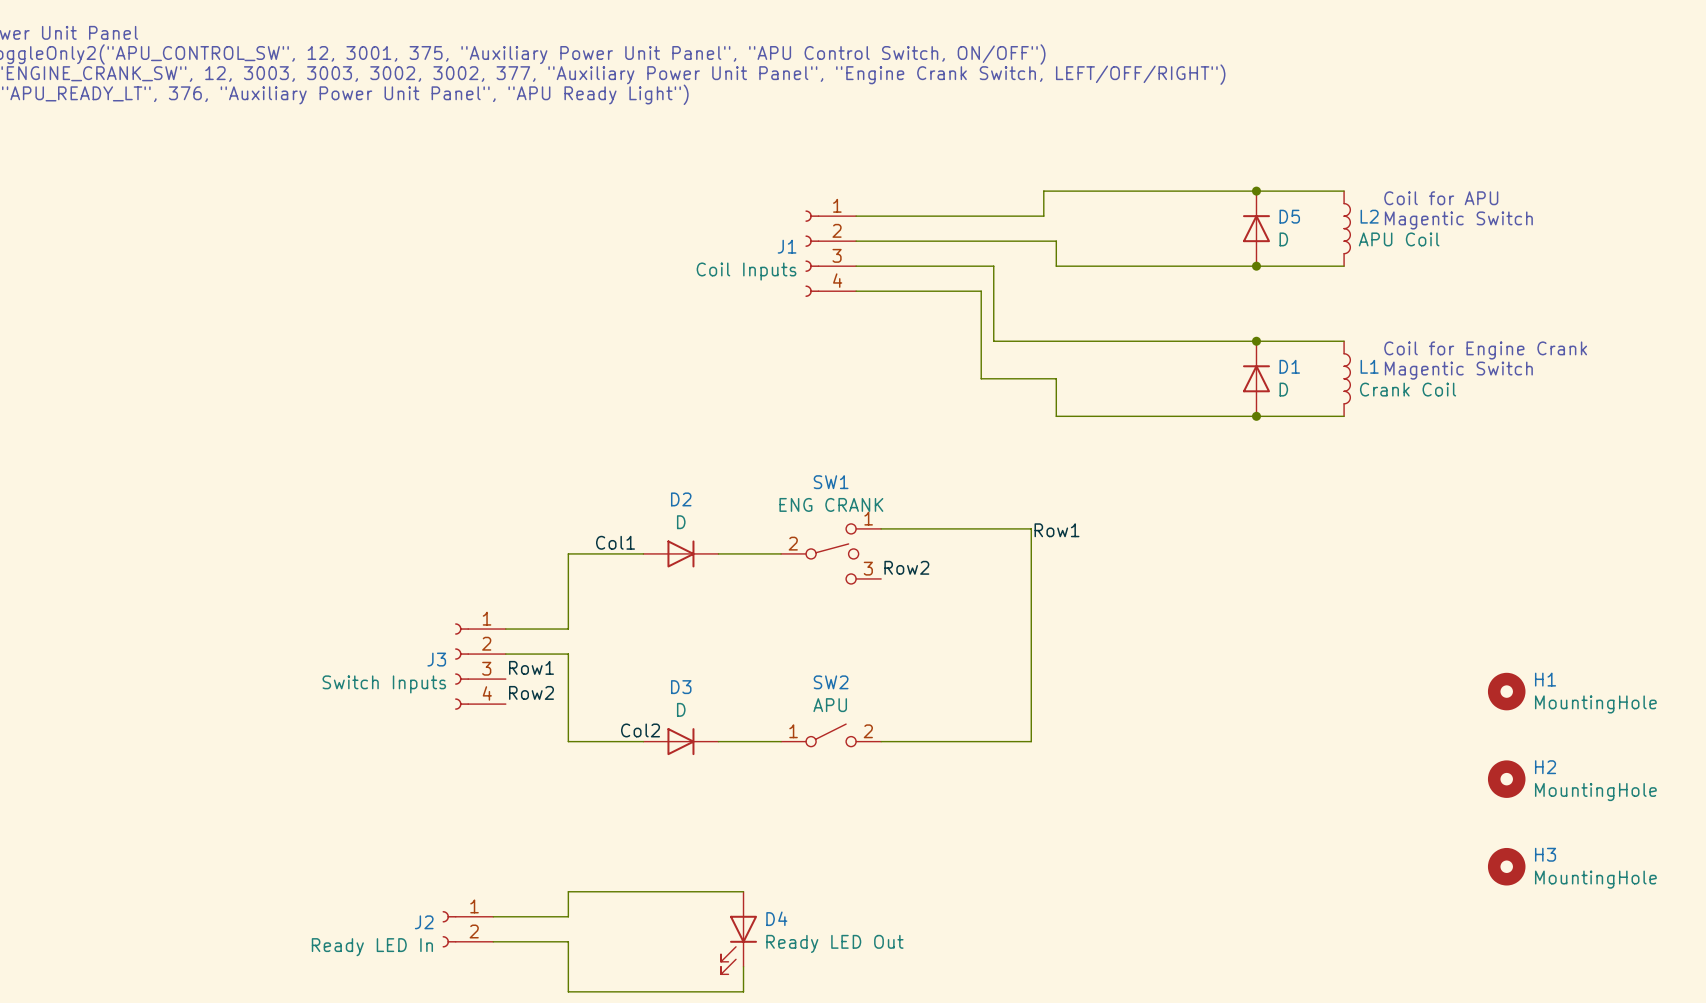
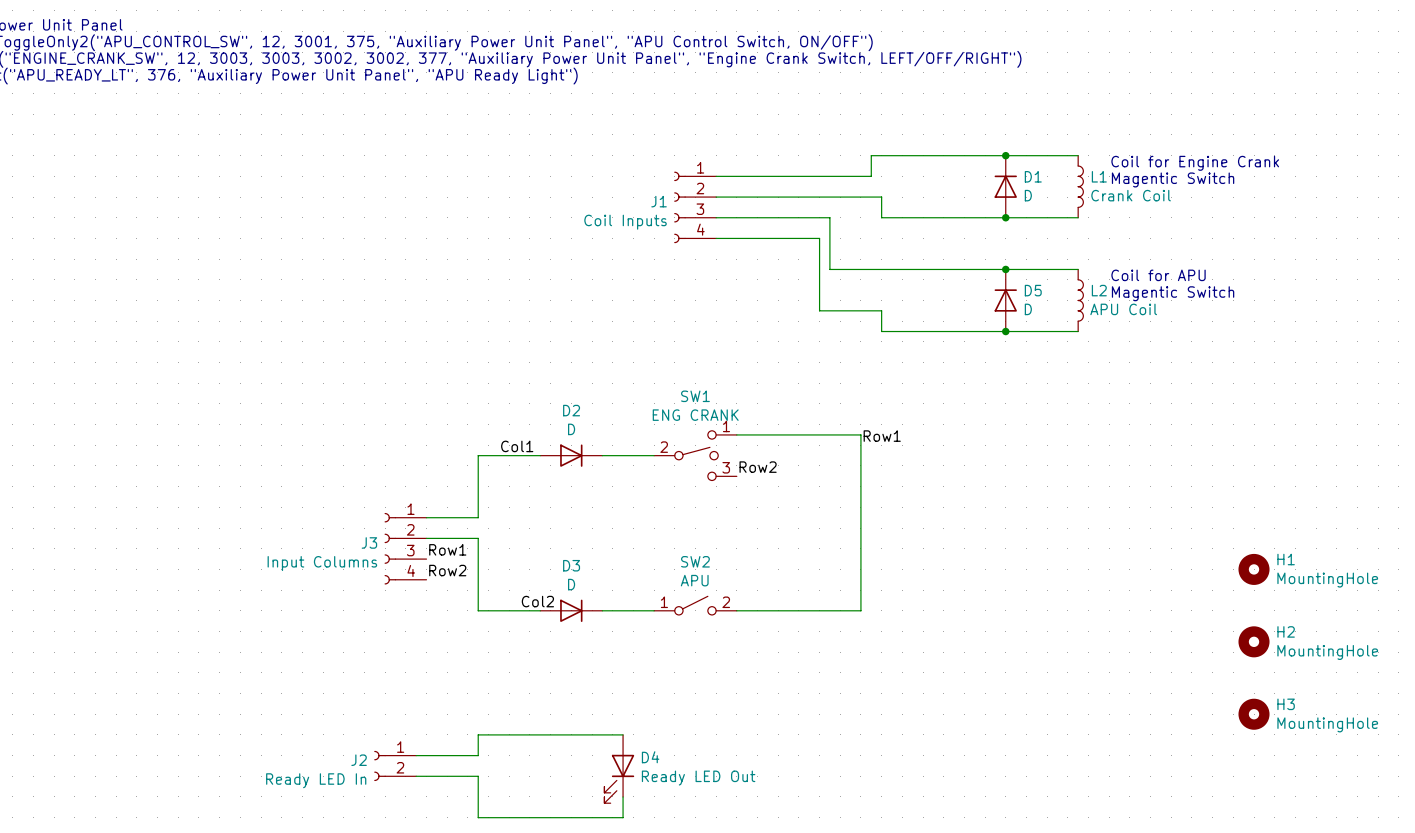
junction: none -> (1005, 155)
junction: (1256, 191) -> none
wire: (1294, 191) (1344, 191) -> none
text position: Coil for APU (1441, 198) -> Coil for APU (1158, 275)
text position: Magentic Switch (1458, 220) -> Magentic Switch (1173, 179)
D5 position: (1256, 228) -> (1005, 300)
L2 position: (1347, 228) -> (1080, 300)
junction: none -> (1005, 217)
junction: (1256, 266) -> none
wire: (1294, 266) (1344, 266) -> none
wire: (993, 328) (993, 341) (1344, 341) -> (829, 269) (1078, 269)
junction: none -> (1005, 269)
junction: (1256, 341) -> none
text position: Coil for Engine Crank (1485, 350) -> Coil for Engine Crank (1195, 163)
text position: Magentic Switch (1458, 370) -> Magentic Switch (1173, 293)
D1 position: (1256, 378) -> (1005, 186)
L1 position: (1347, 378) -> (1080, 186)
wire: (1056, 403) (1056, 416) (1344, 416) -> (881, 331) (1078, 331)
junction: none -> (1005, 331)
junction: (1256, 416) -> none
J3 value: Switch Inputs (384, 684) -> Input Columns (322, 563)

